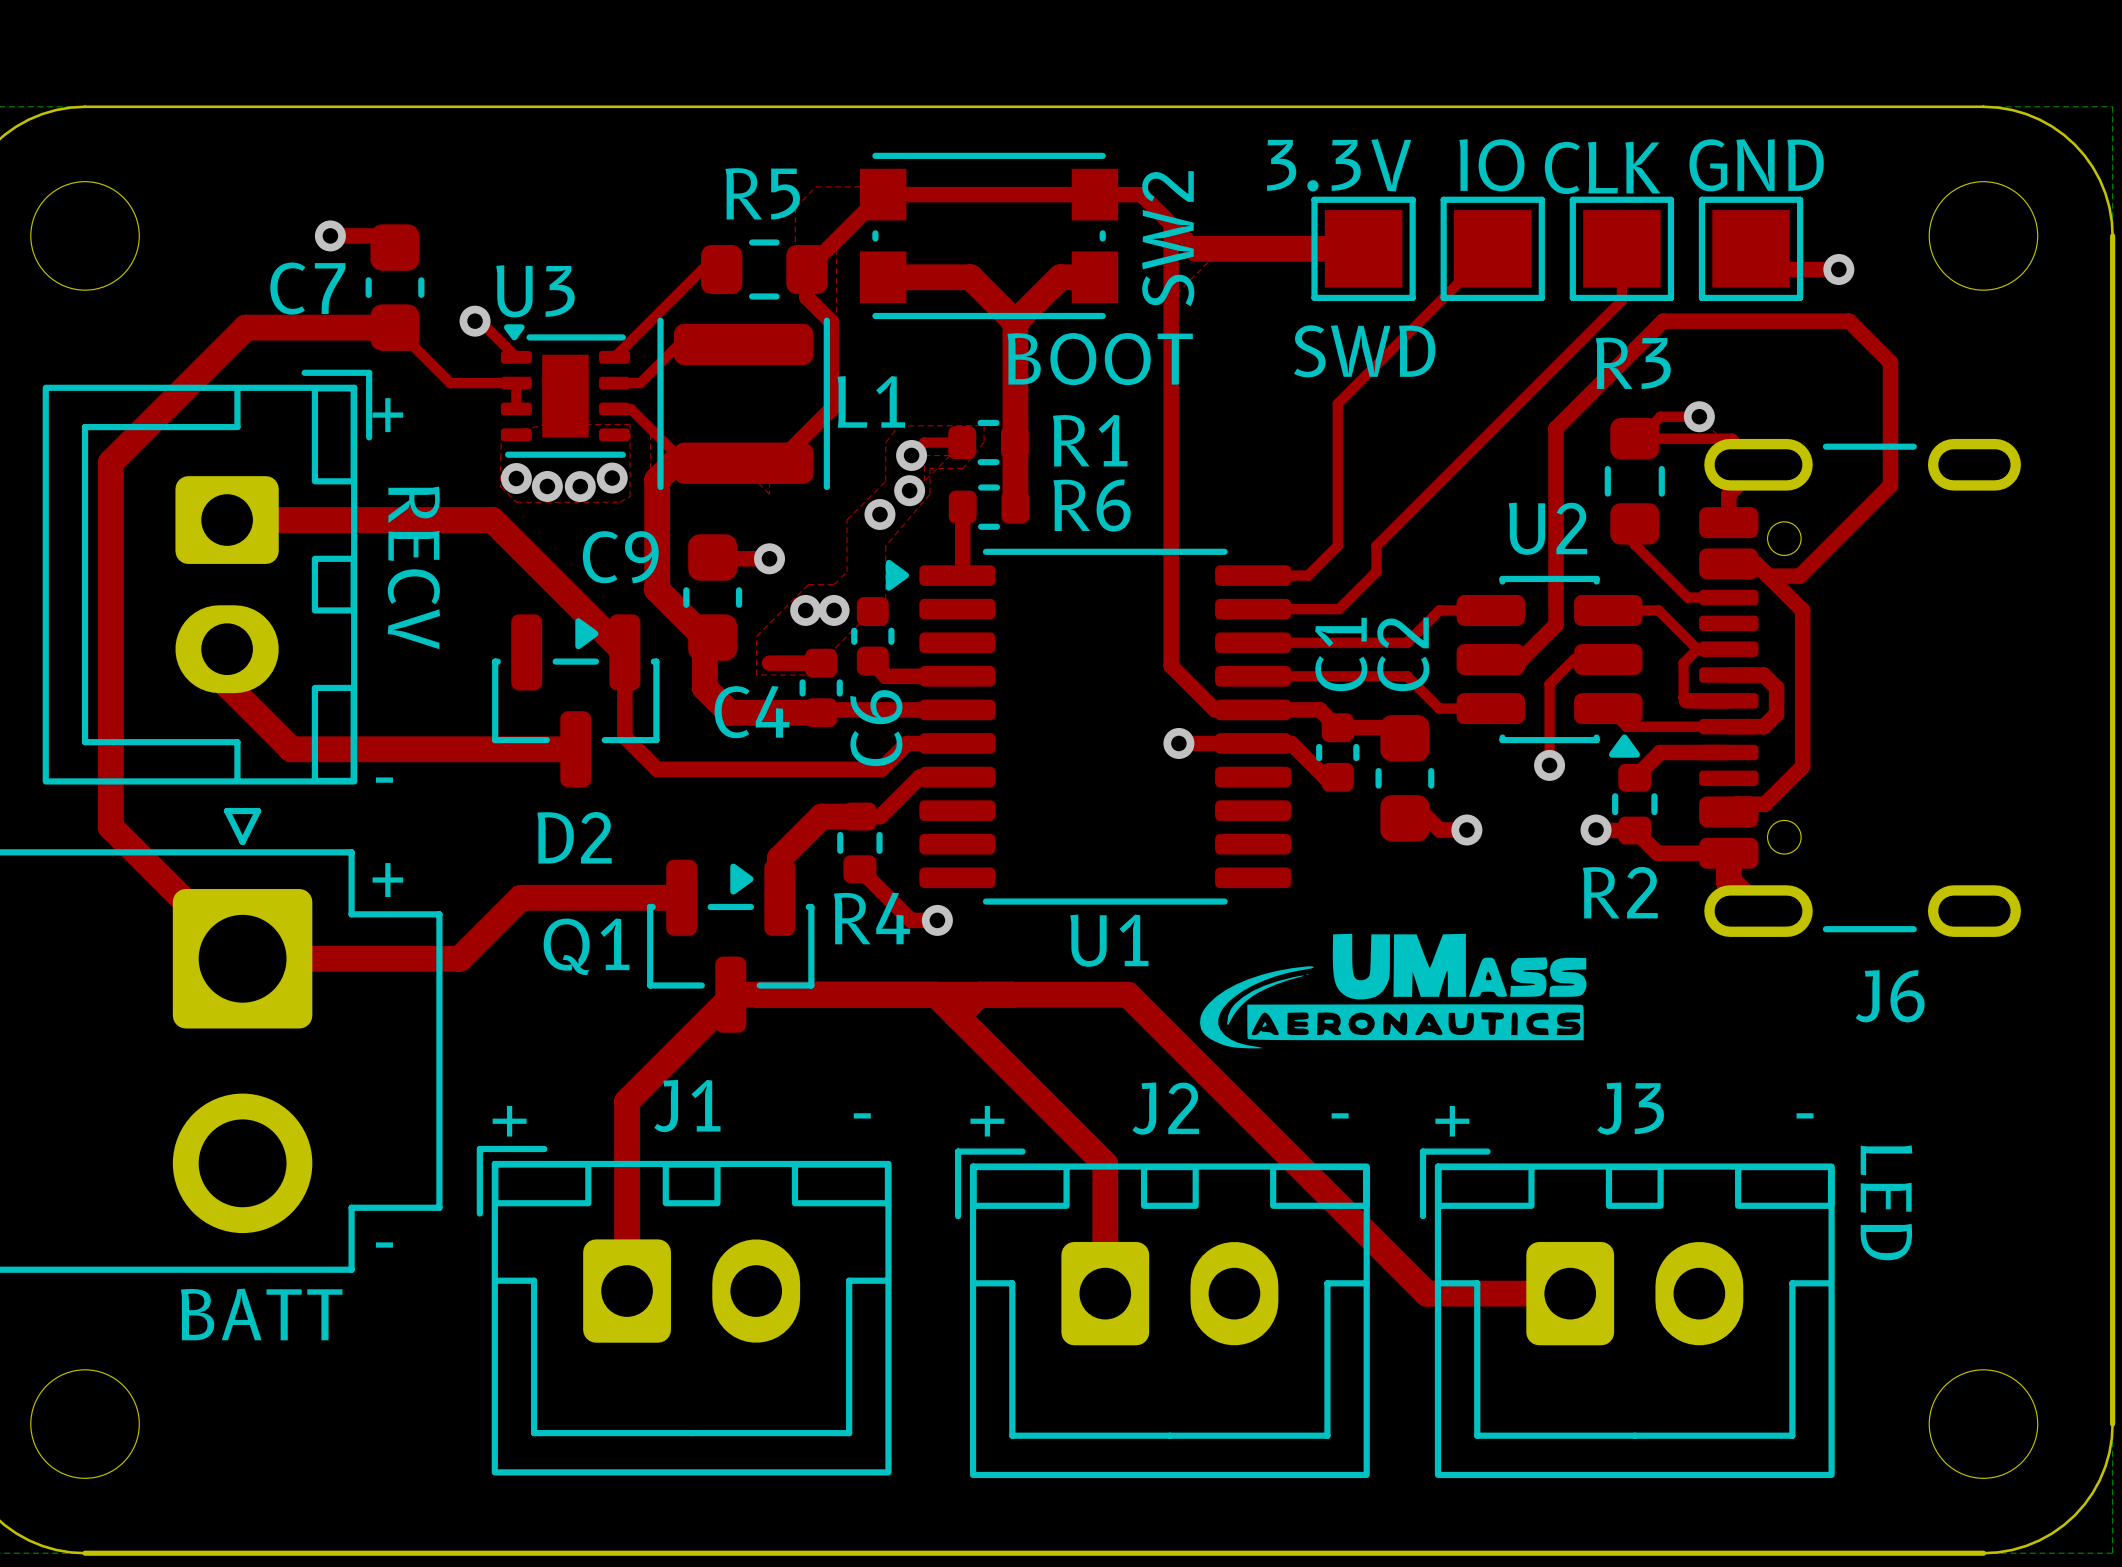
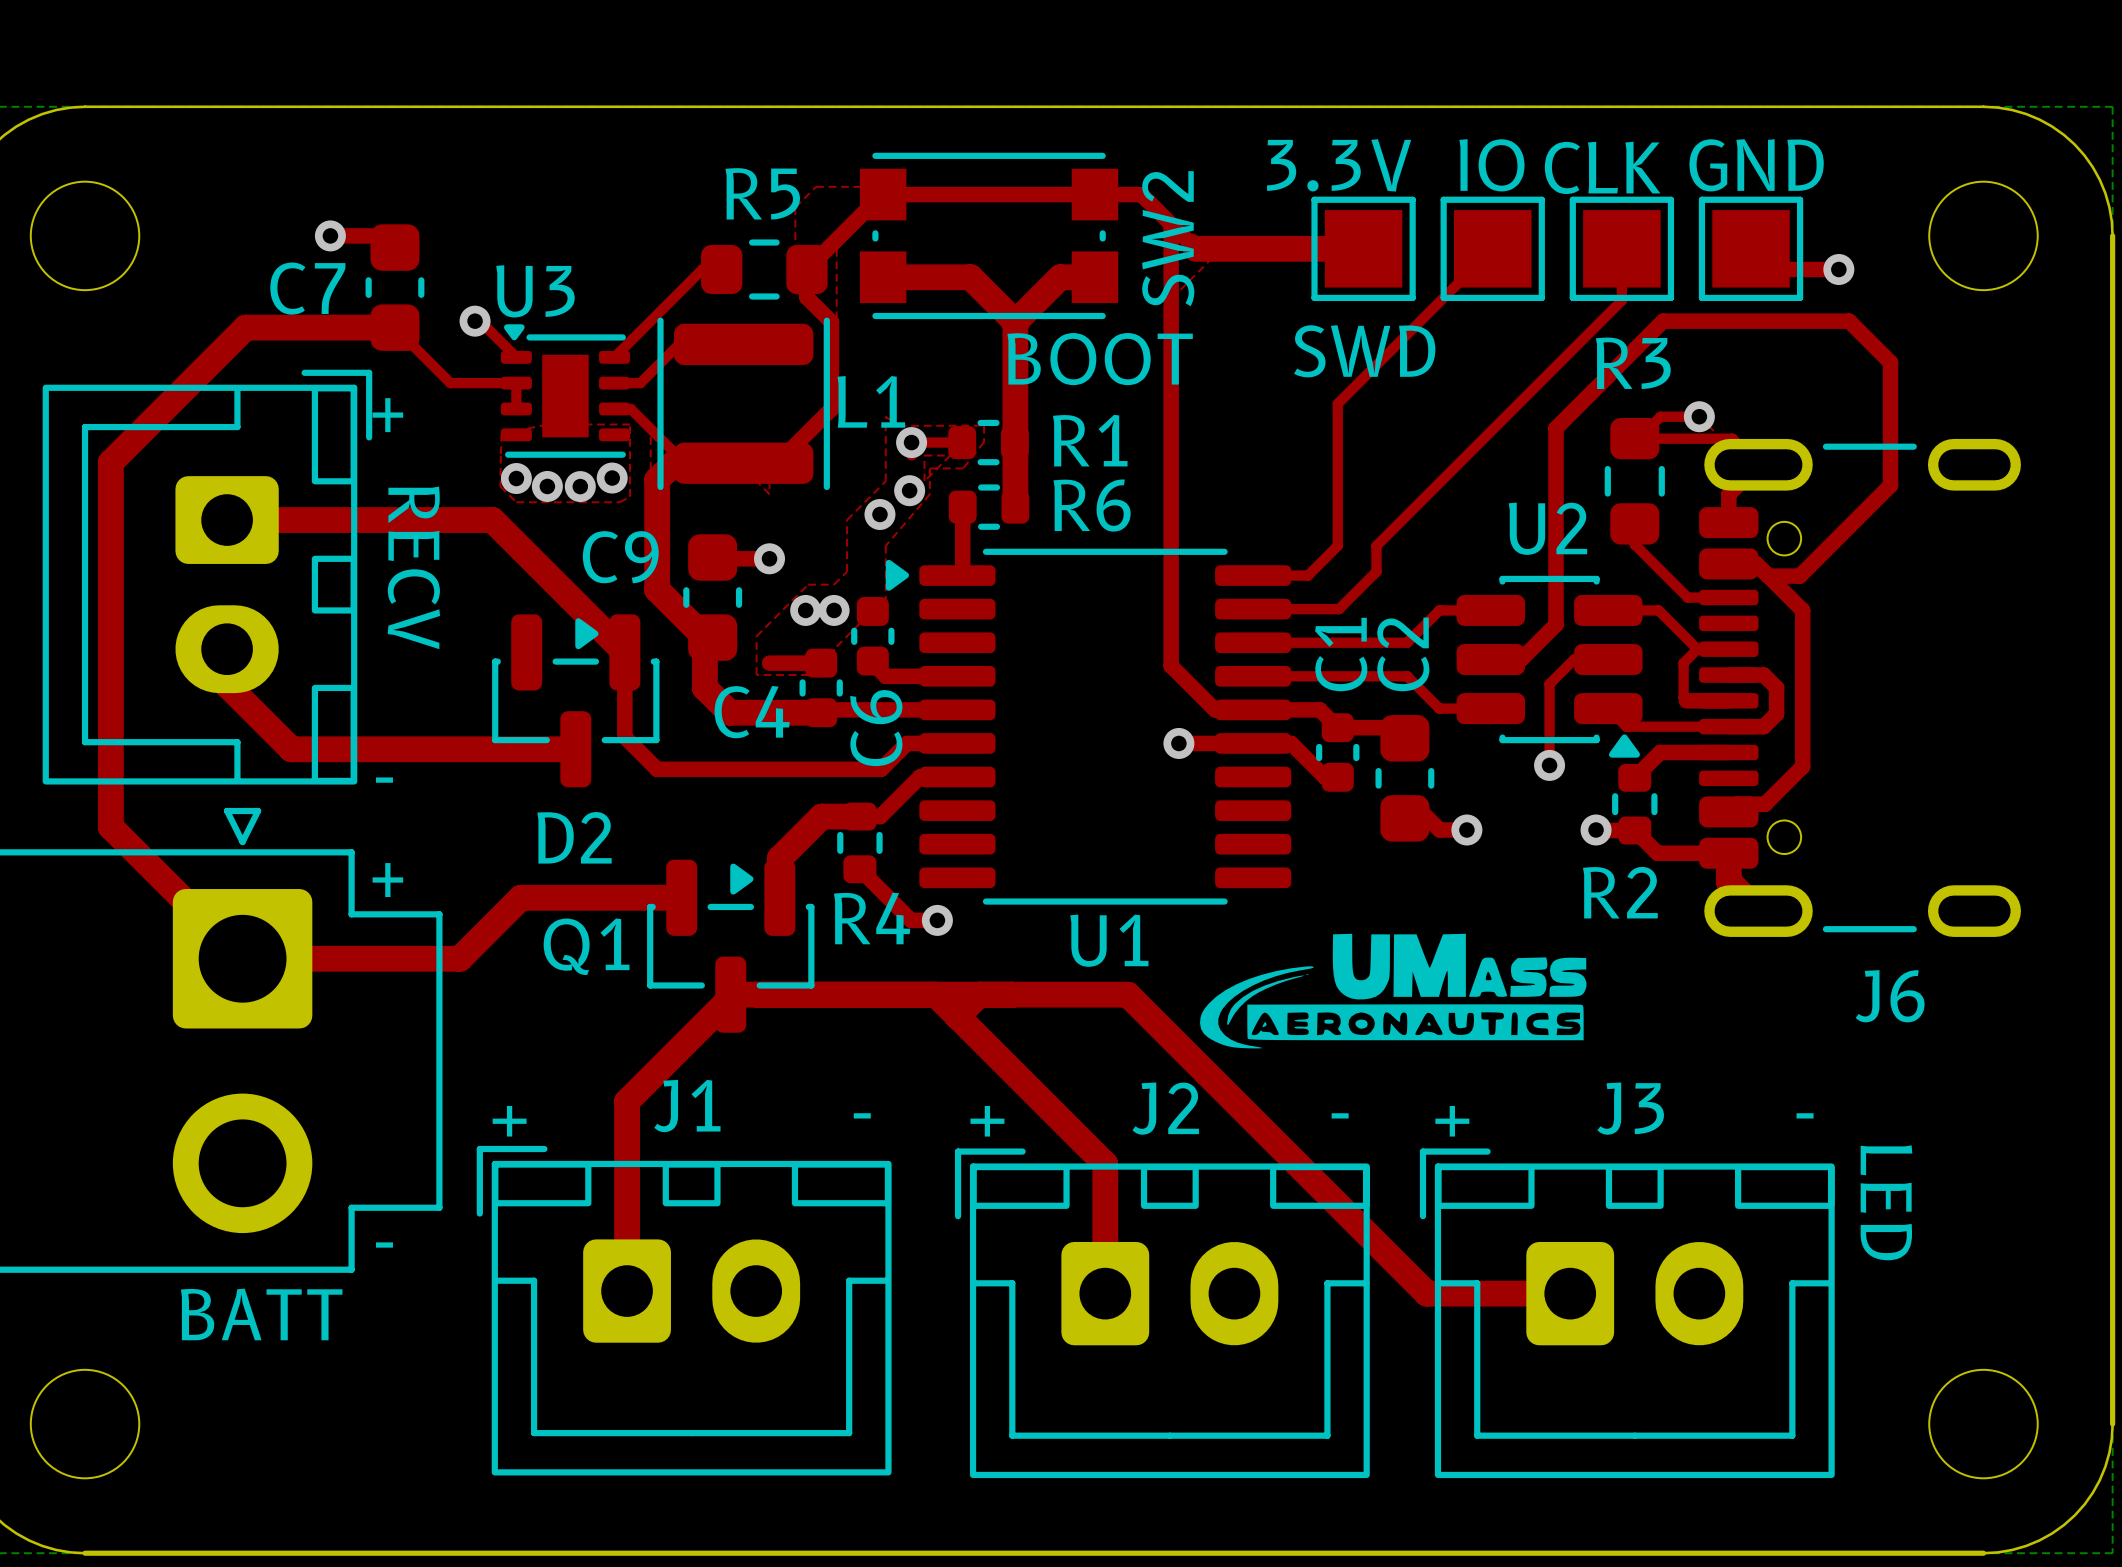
top zone outline: (898, 425) (885, 442) -> (898, 425) (885, 416) (885, 442)
via position: (911, 455) -> (911, 442)

